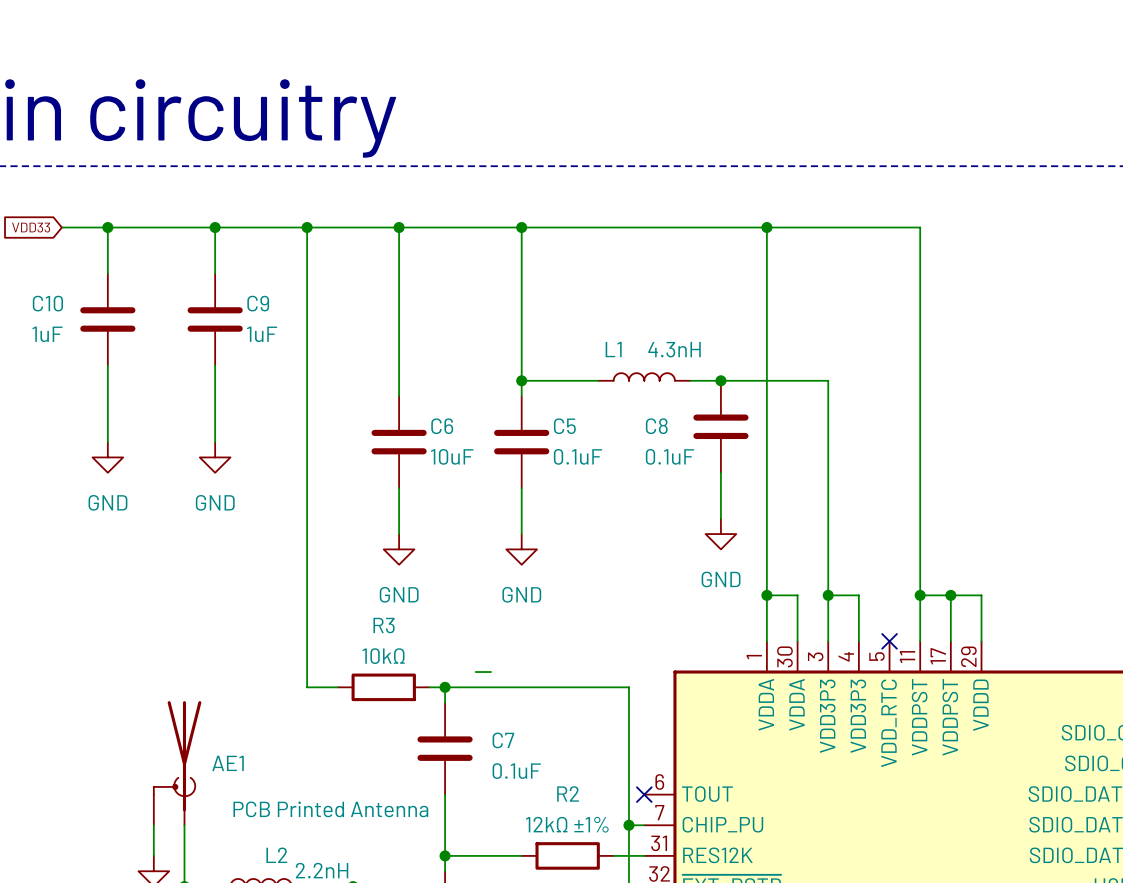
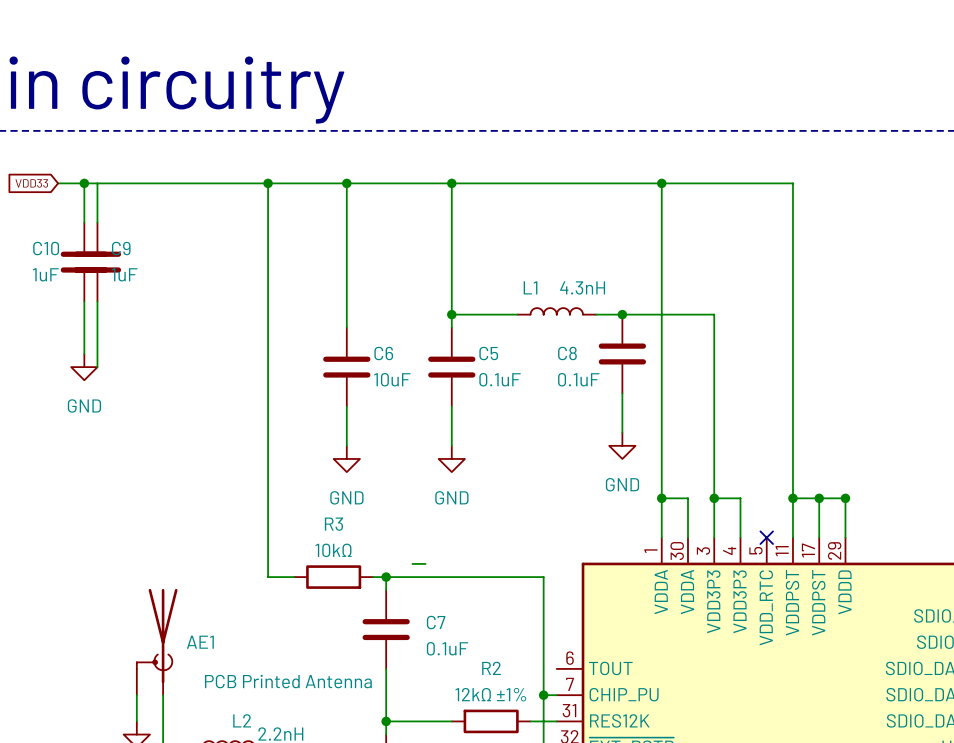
junction position: (107, 227) -> (84, 183)
wire: (215, 227) (215, 273) -> (84, 183) (84, 222)
junction: (215, 227) -> none
C9 position: (215, 319) -> (84, 262)
wire: none -> (84, 301) (84, 353)
wire: (215, 365) (215, 442) -> none
power symbol position: GND (107, 457) -> GND (84, 367)
power symbol: GND (215, 457) -> none
junction: none -> (845, 498)
no-connect mark: (644, 794) -> none

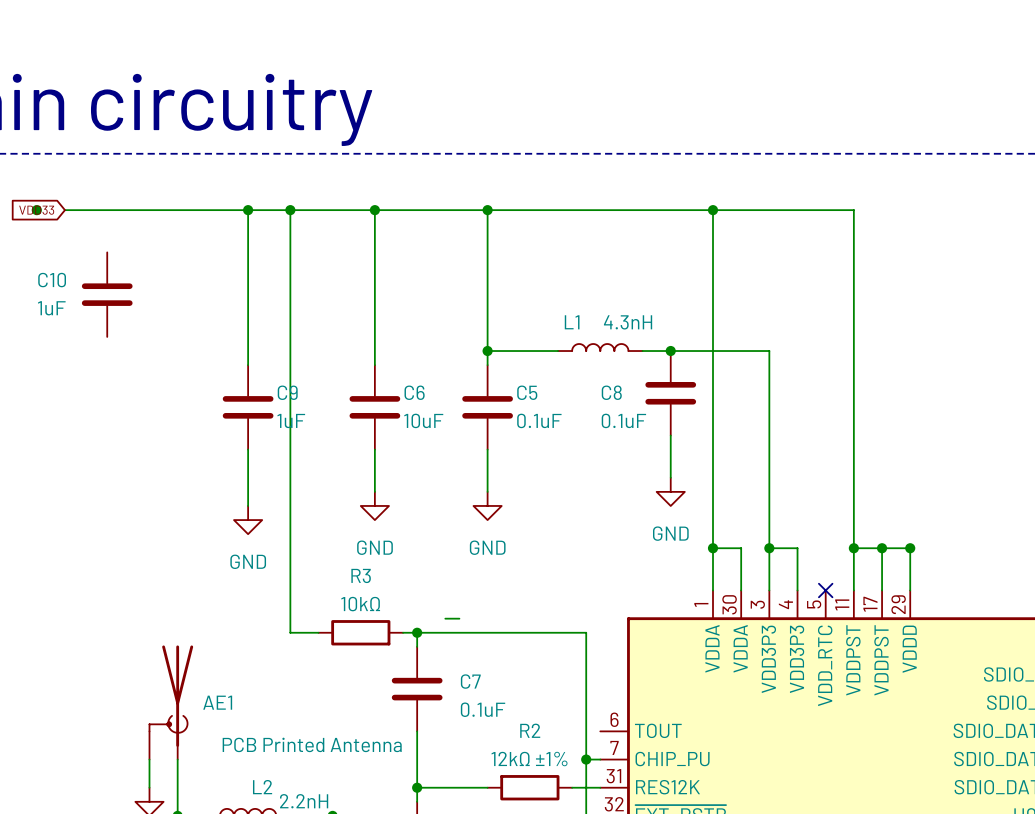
wire: (84, 183) (84, 222) -> none
junction position: (84, 183) -> (36, 210)
wire: (97, 183) (97, 222) -> none
wire: none -> (248, 210) (248, 365)
junction: none -> (248, 210)
C9 position: (84, 262) -> (248, 407)
wire: (84, 301) (84, 353) -> (248, 449) (248, 505)
wire: (97, 301) (97, 367) -> none
power symbol: GND (84, 367) -> none
power symbol: none -> GND (248, 520)

